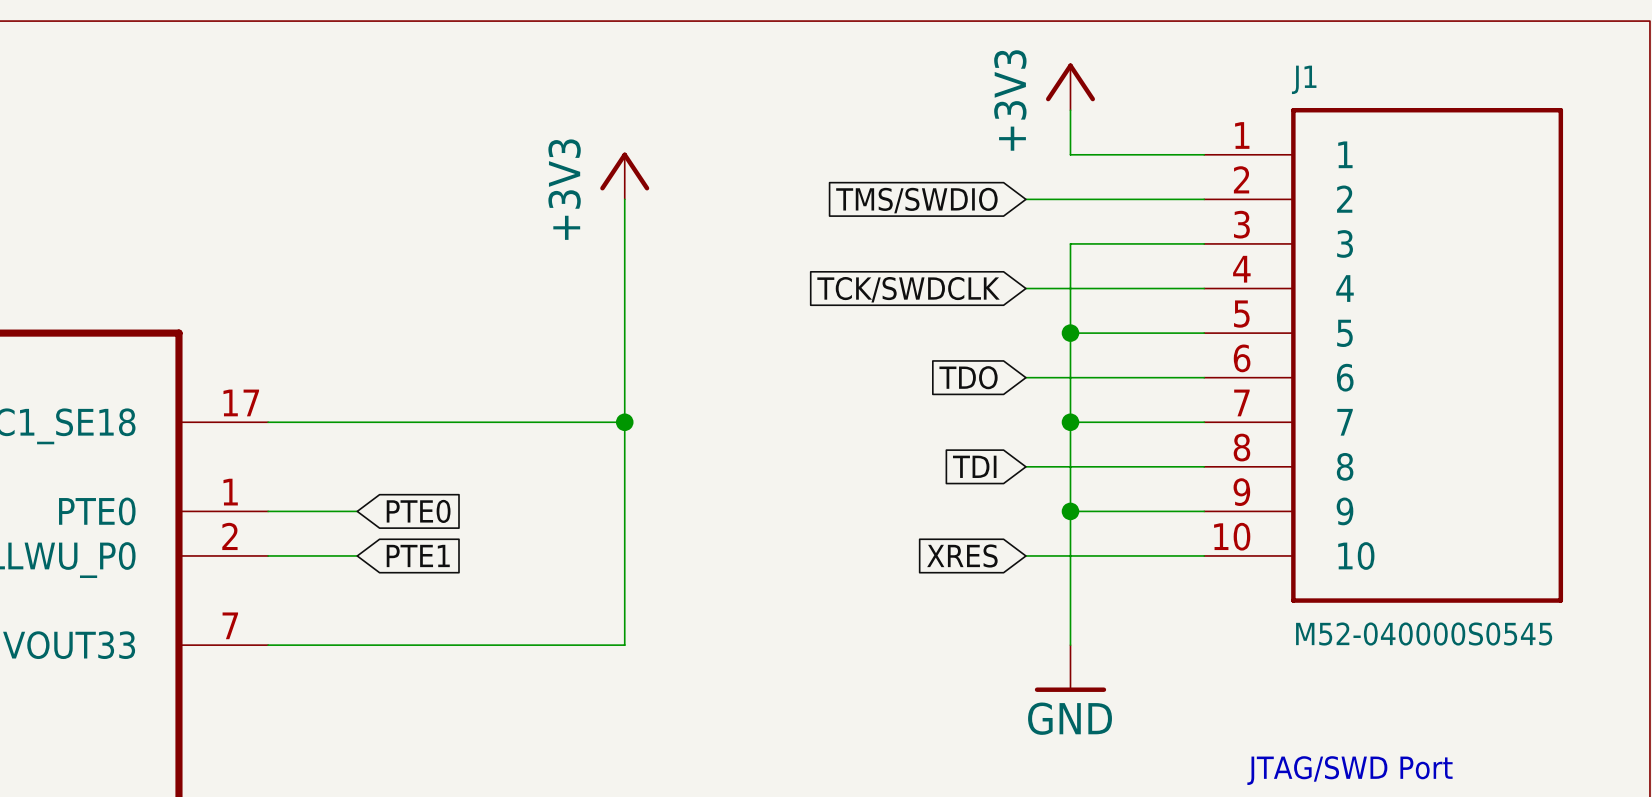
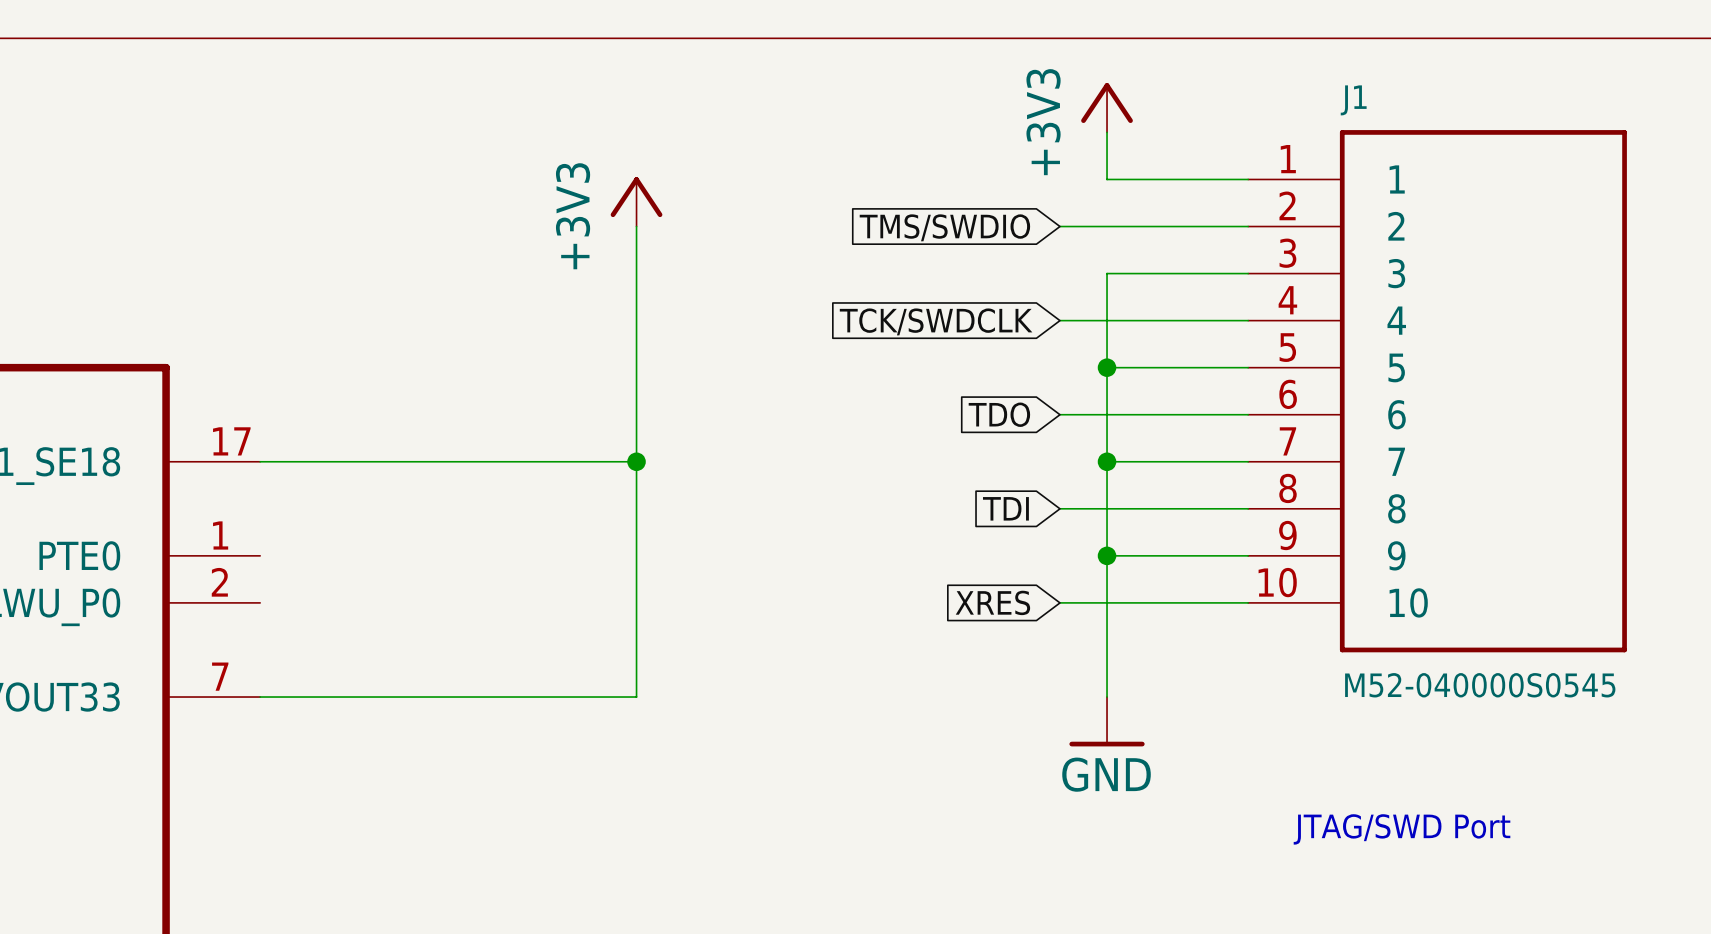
wire: (268, 511) (357, 511) -> none
global label: PTE0 (418, 511) -> none
wire: (268, 555) (357, 555) -> none
global label: PTE1 (418, 555) -> none

